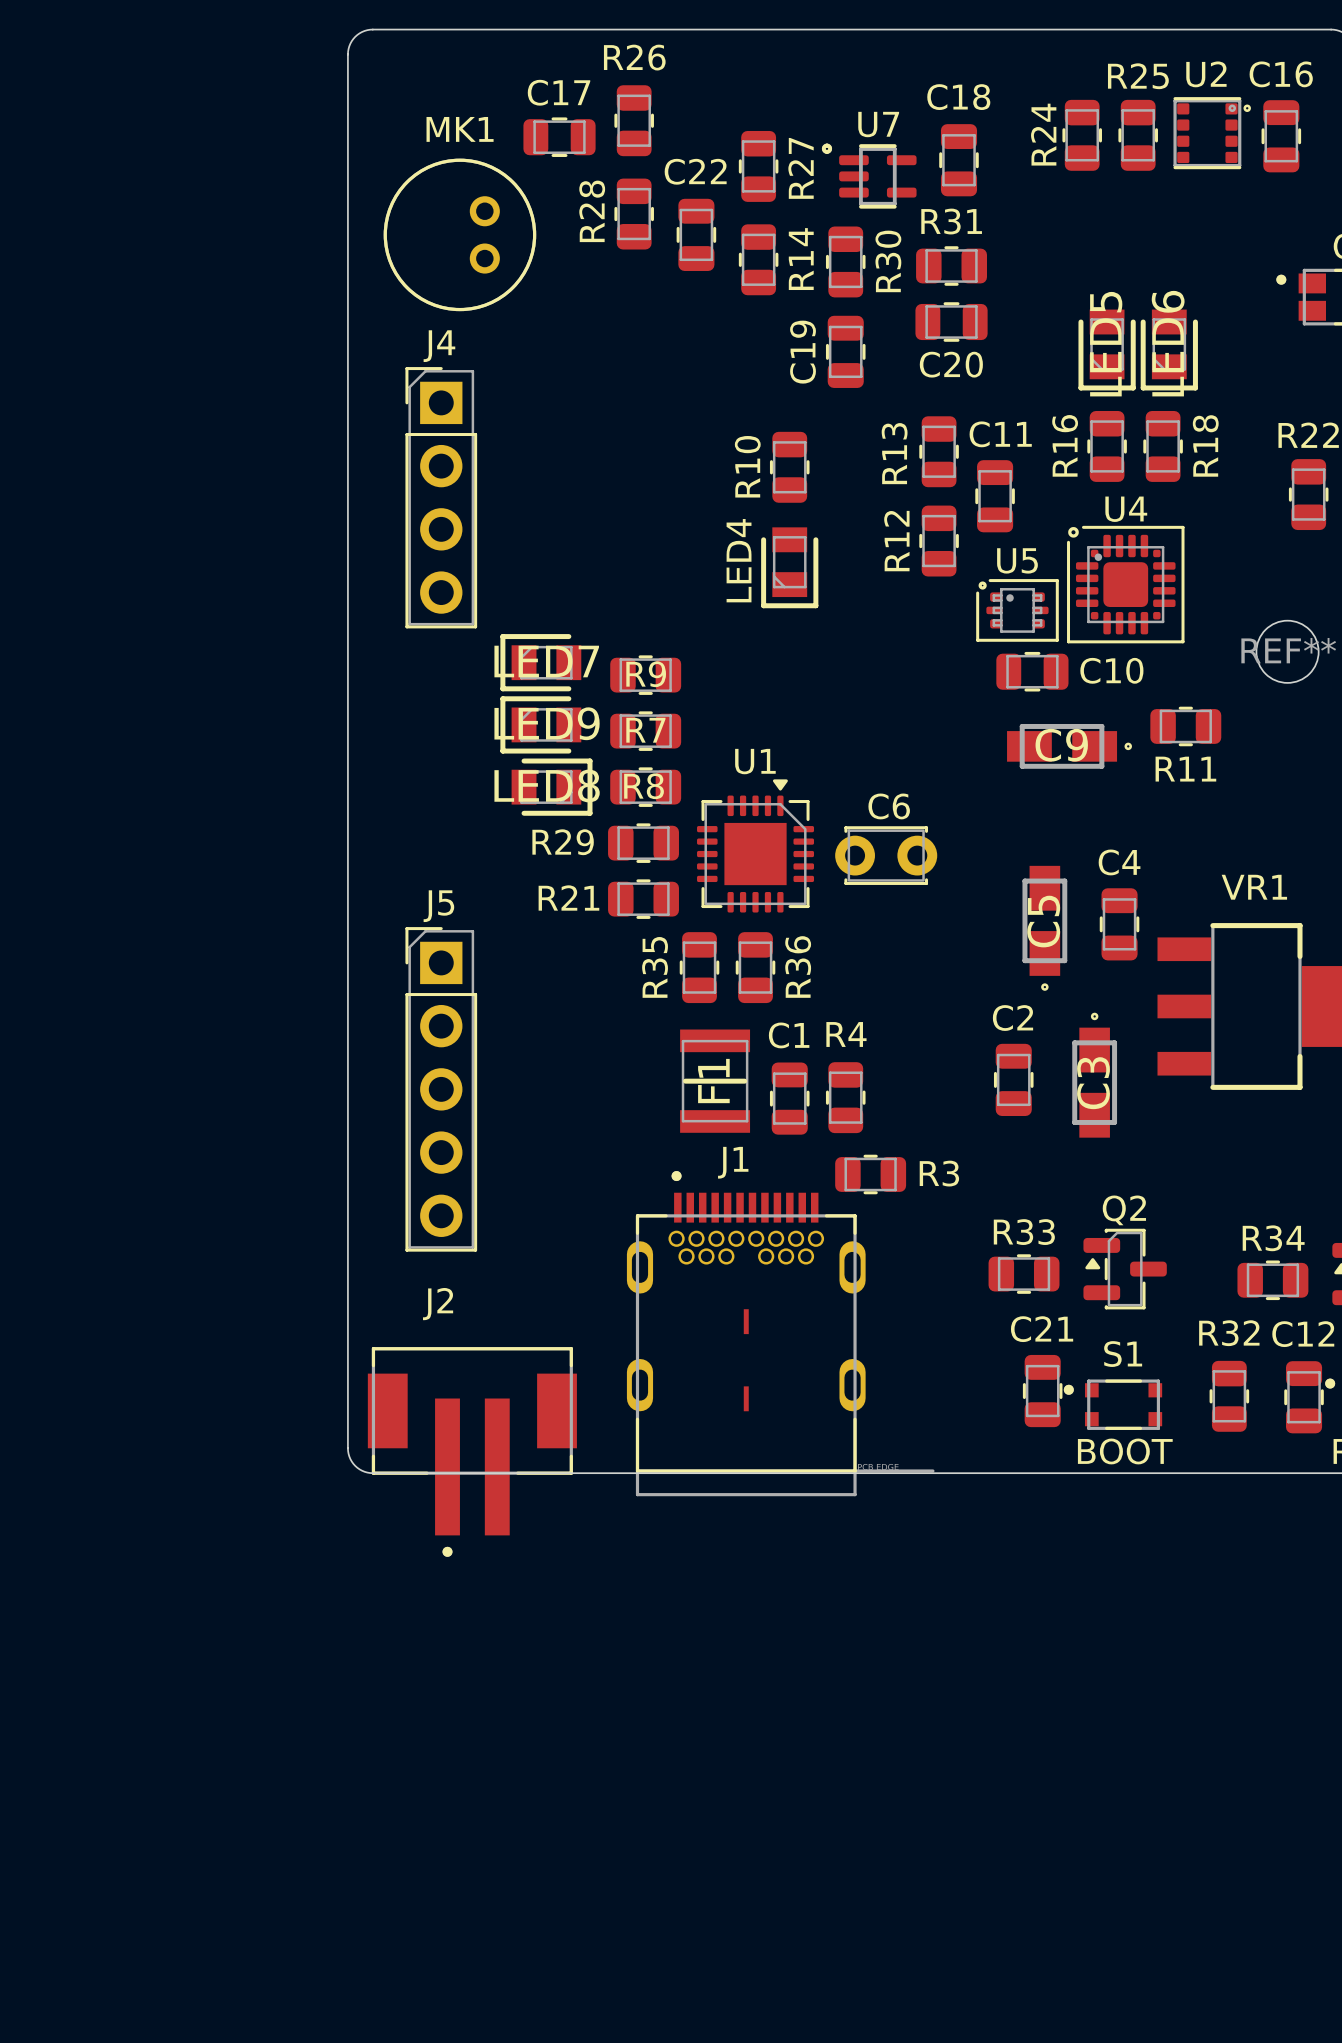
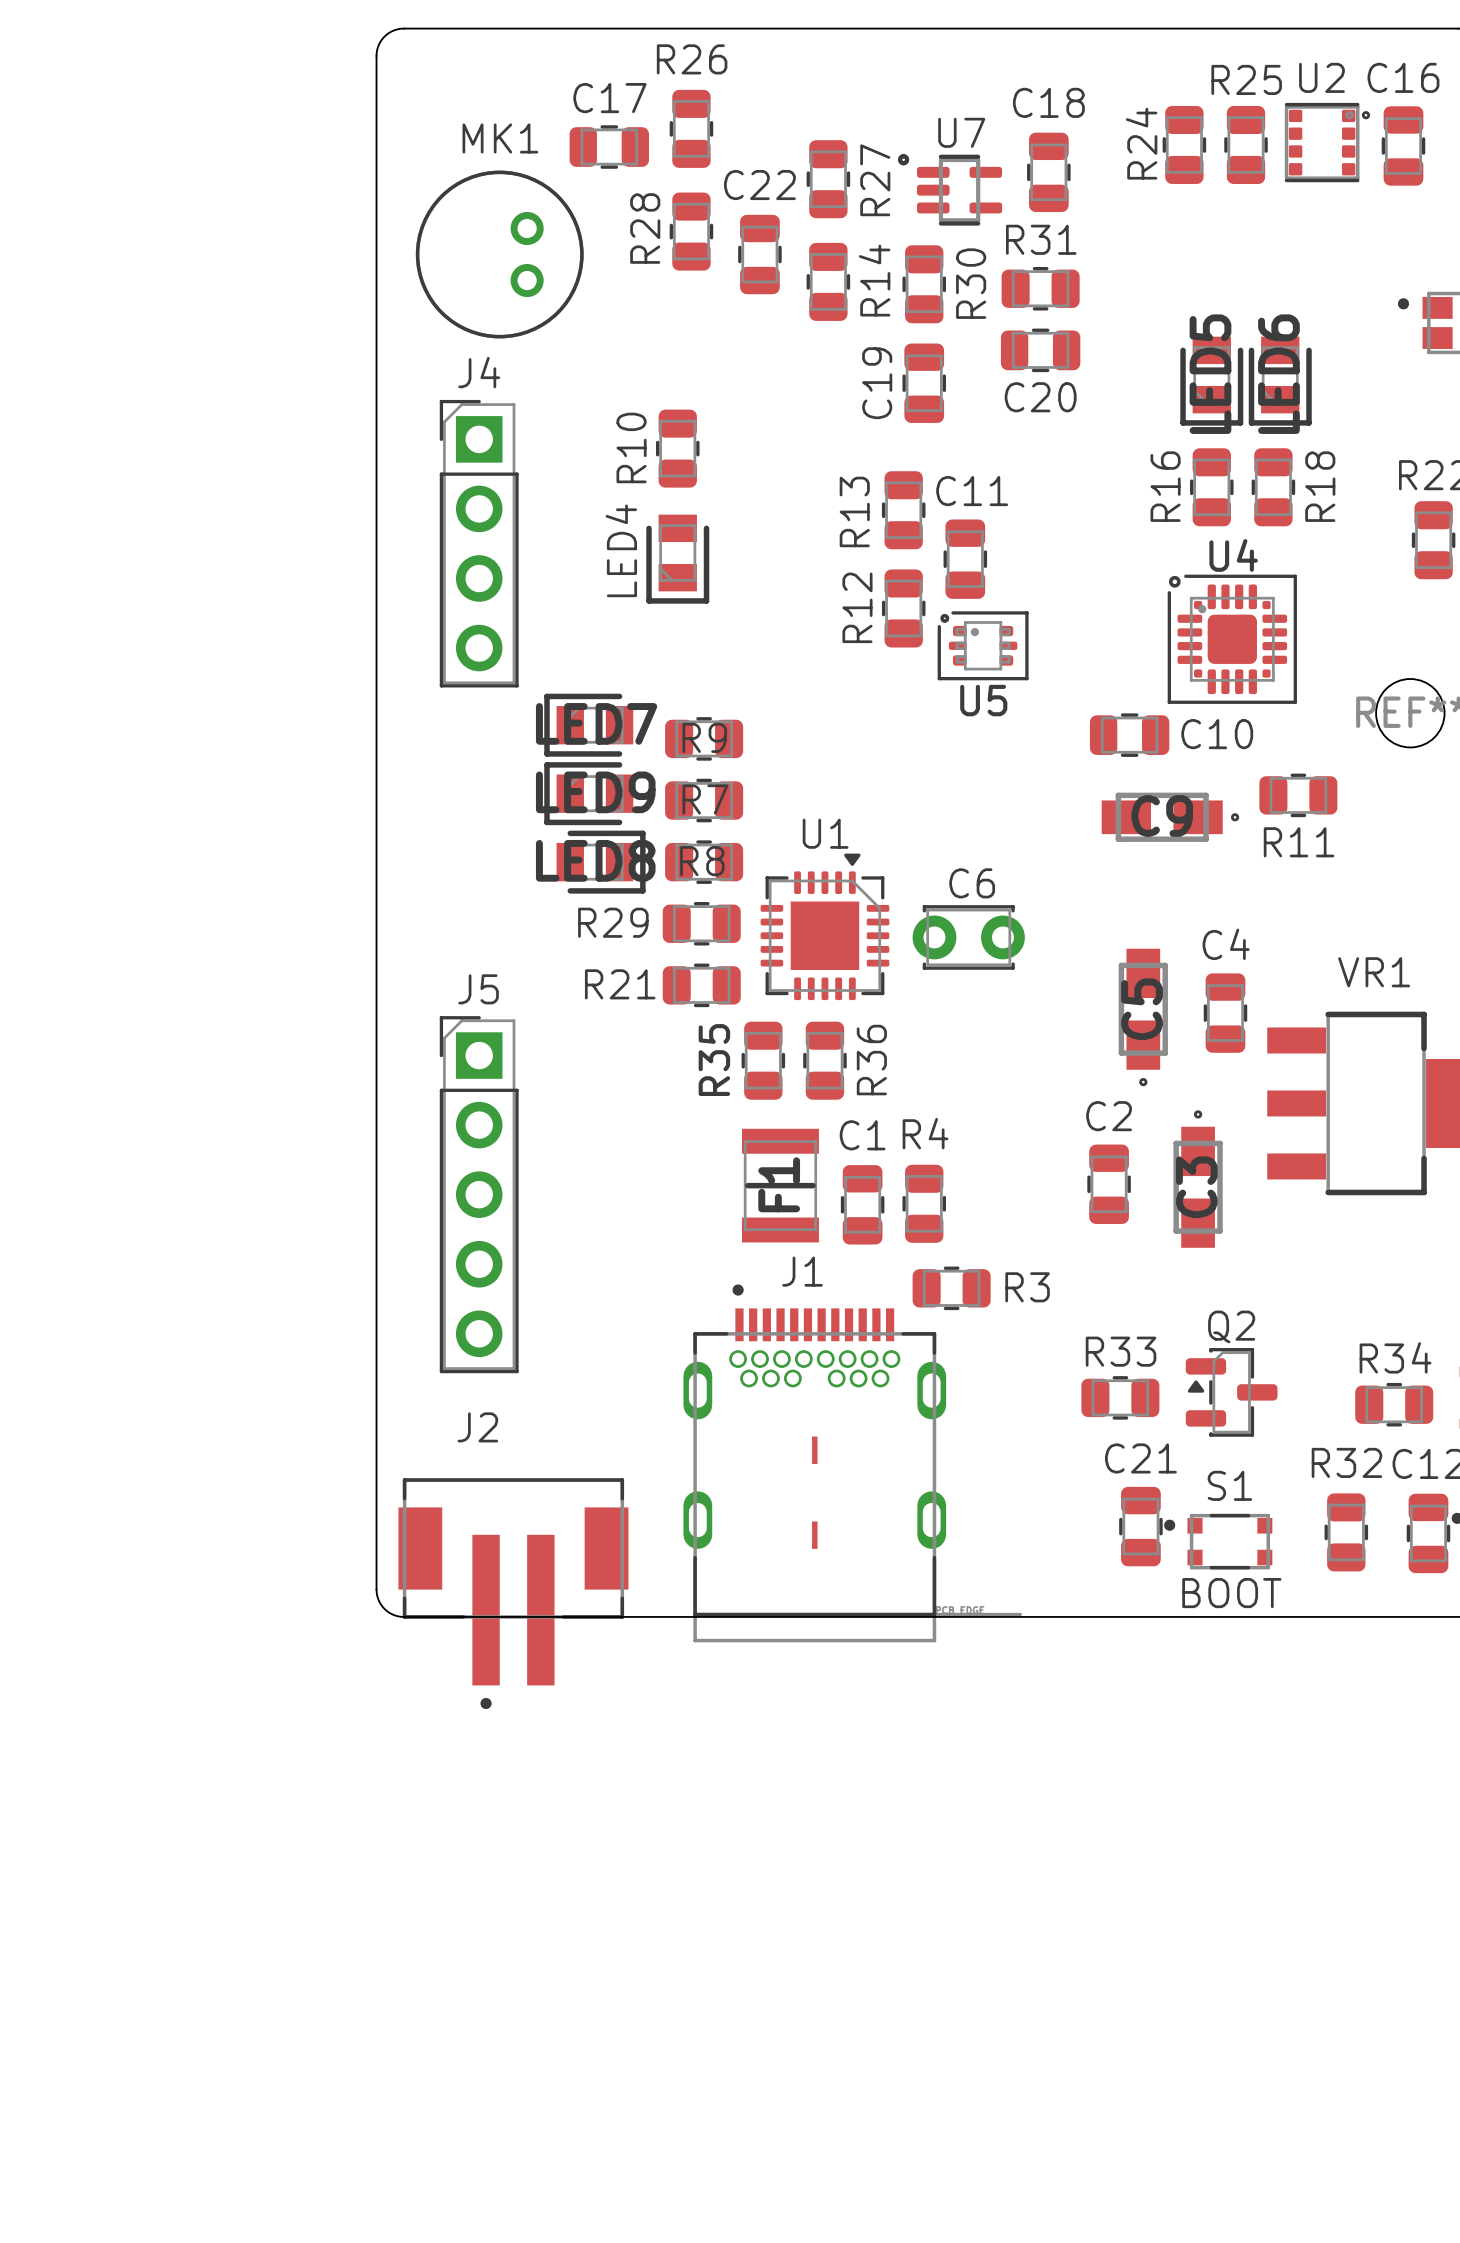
R13 position: (939, 451) -> (903, 510)
R10 position: (789, 467) -> (677, 448)
C11 position: (995, 496) -> (965, 559)
R12 position: (939, 541) -> (903, 608)
U5 name position: U5 (1017, 560) -> U5 (983, 700)
LED4 position: (789, 567) -> (677, 559)
U5 position: (1017, 610) -> (983, 645)

